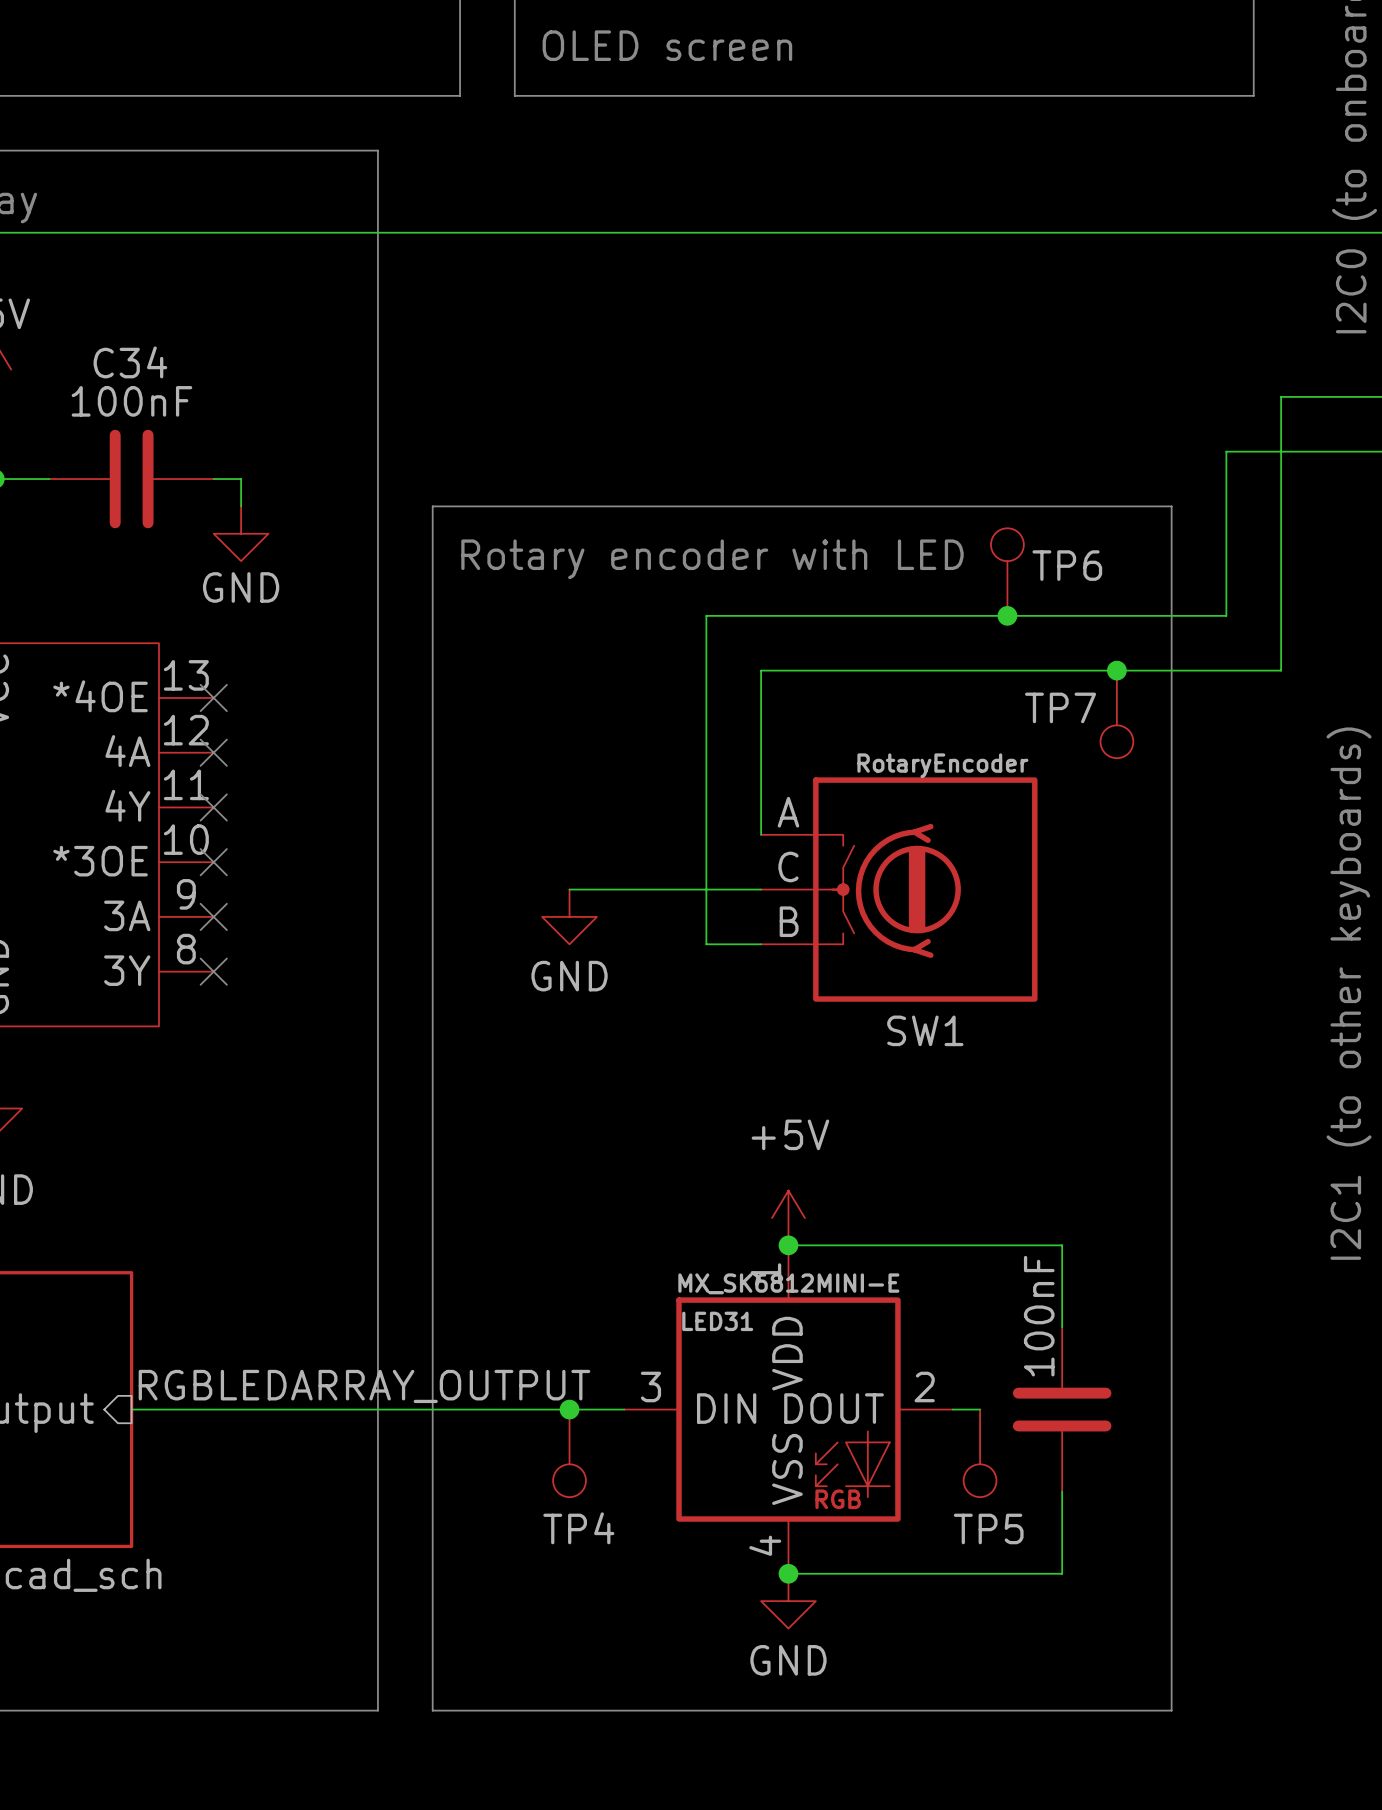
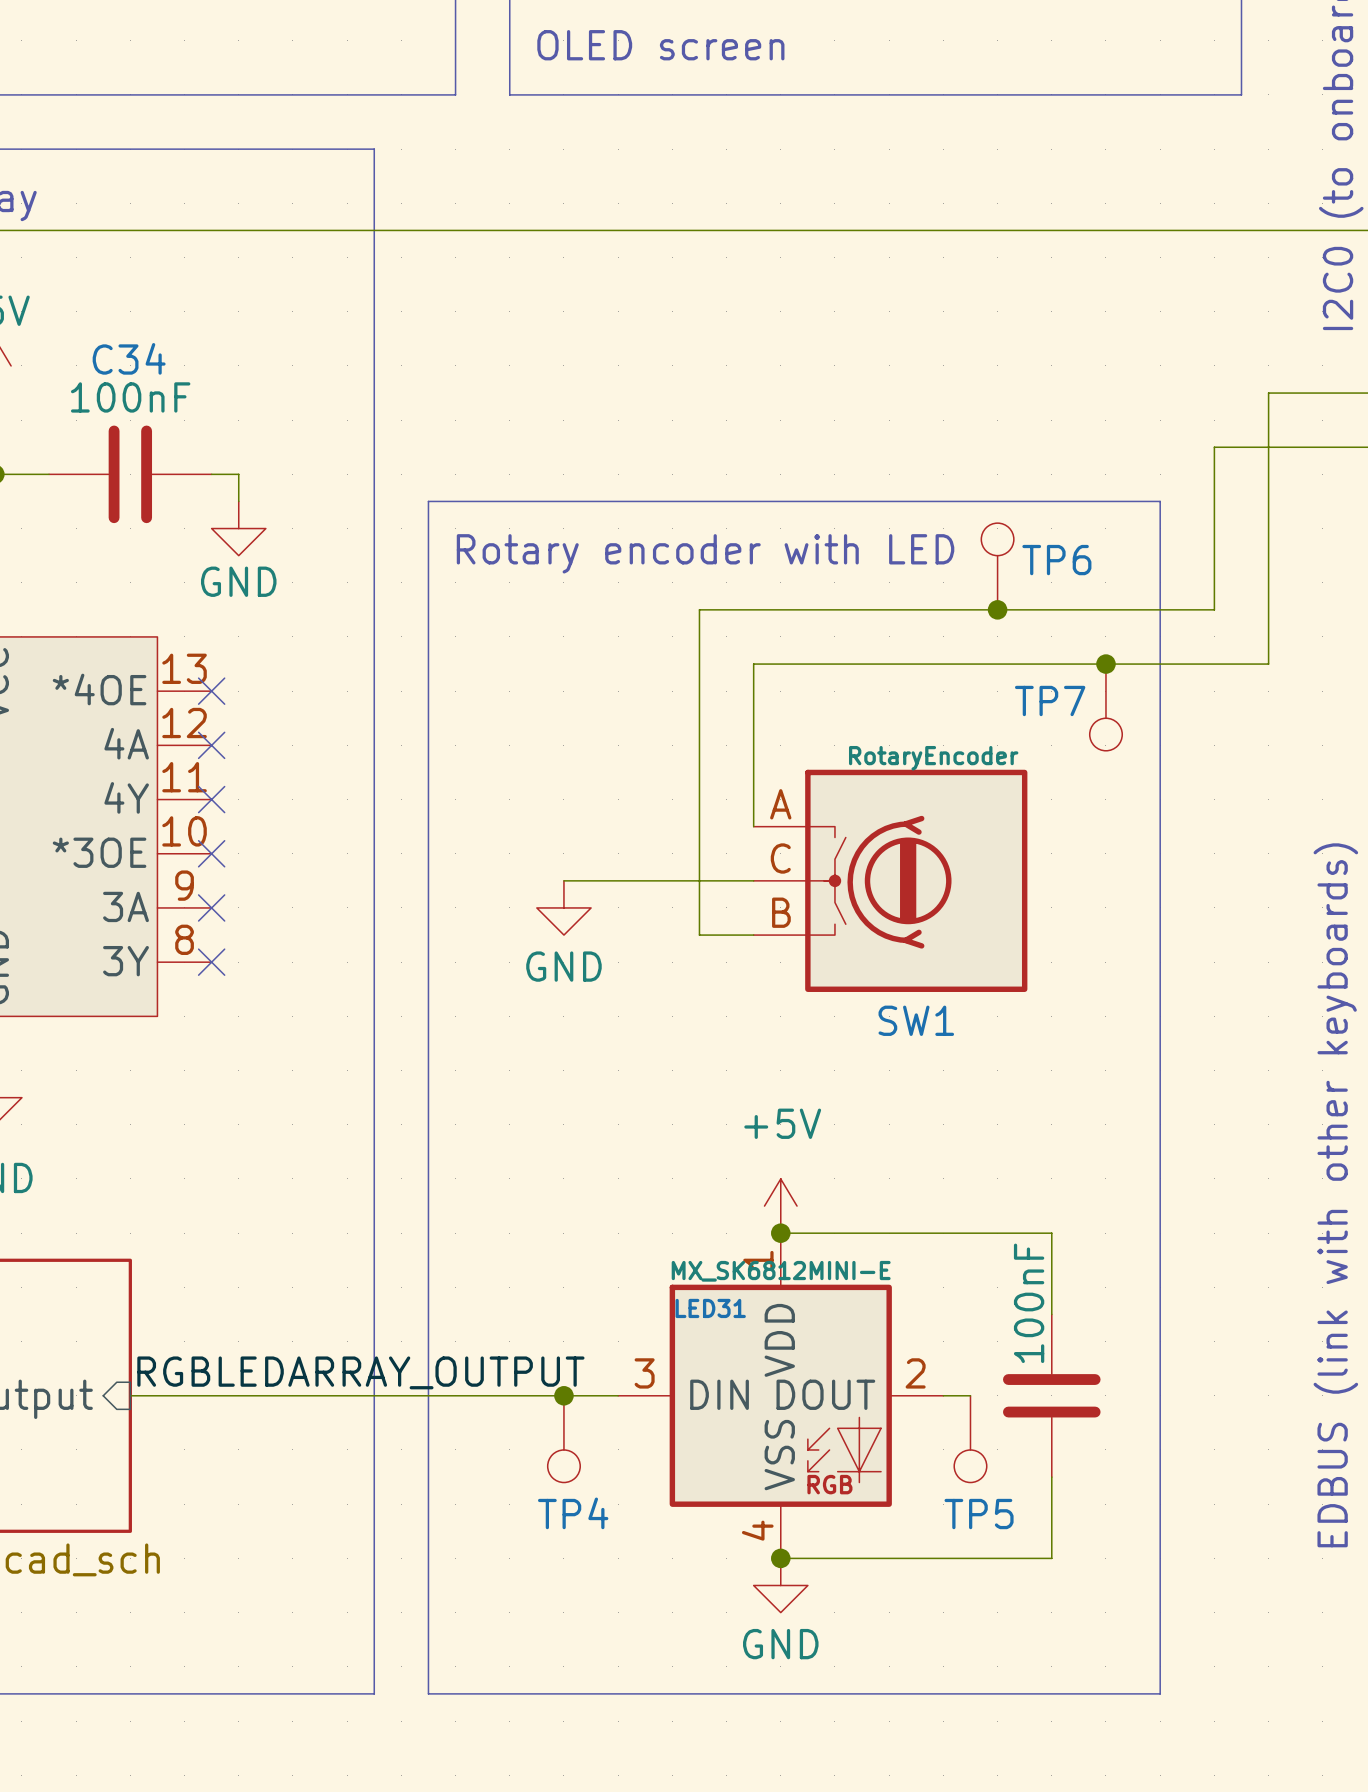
text: I2C1 (to other keyboards) (1349, 993) -> EDBUS (link with other keyboards) (1335, 1195)

